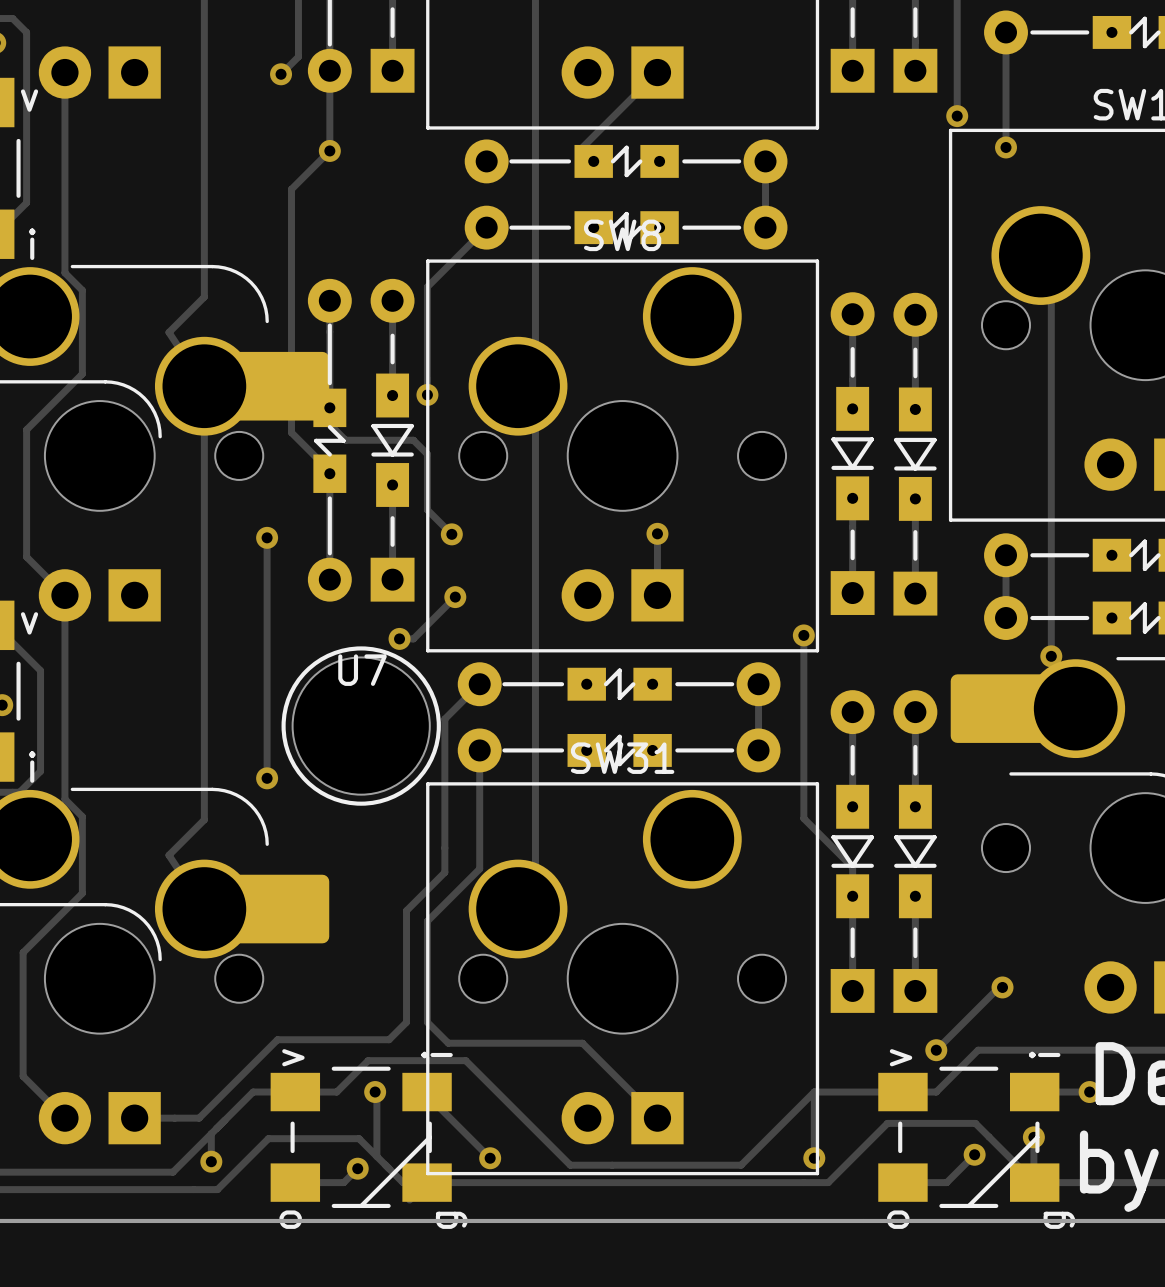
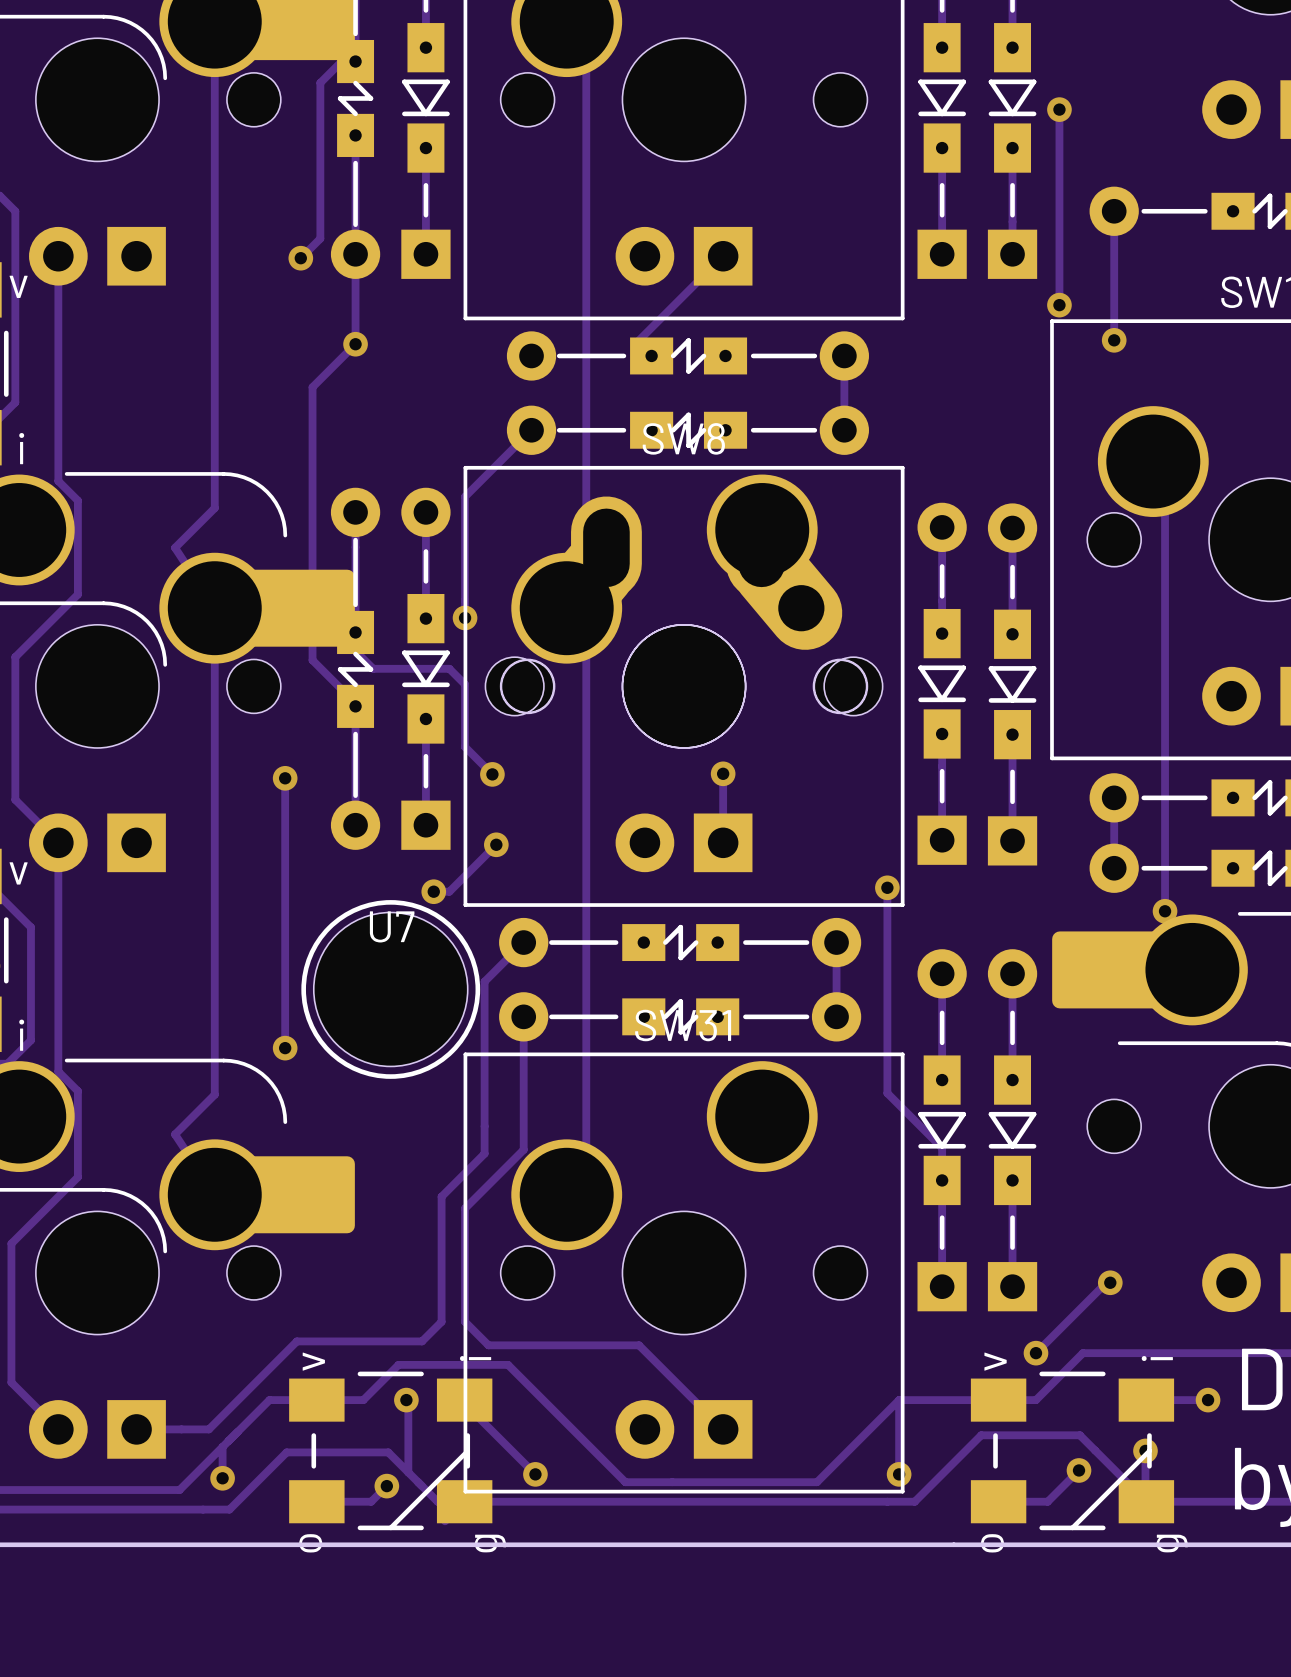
part: none -> (684, 622)

